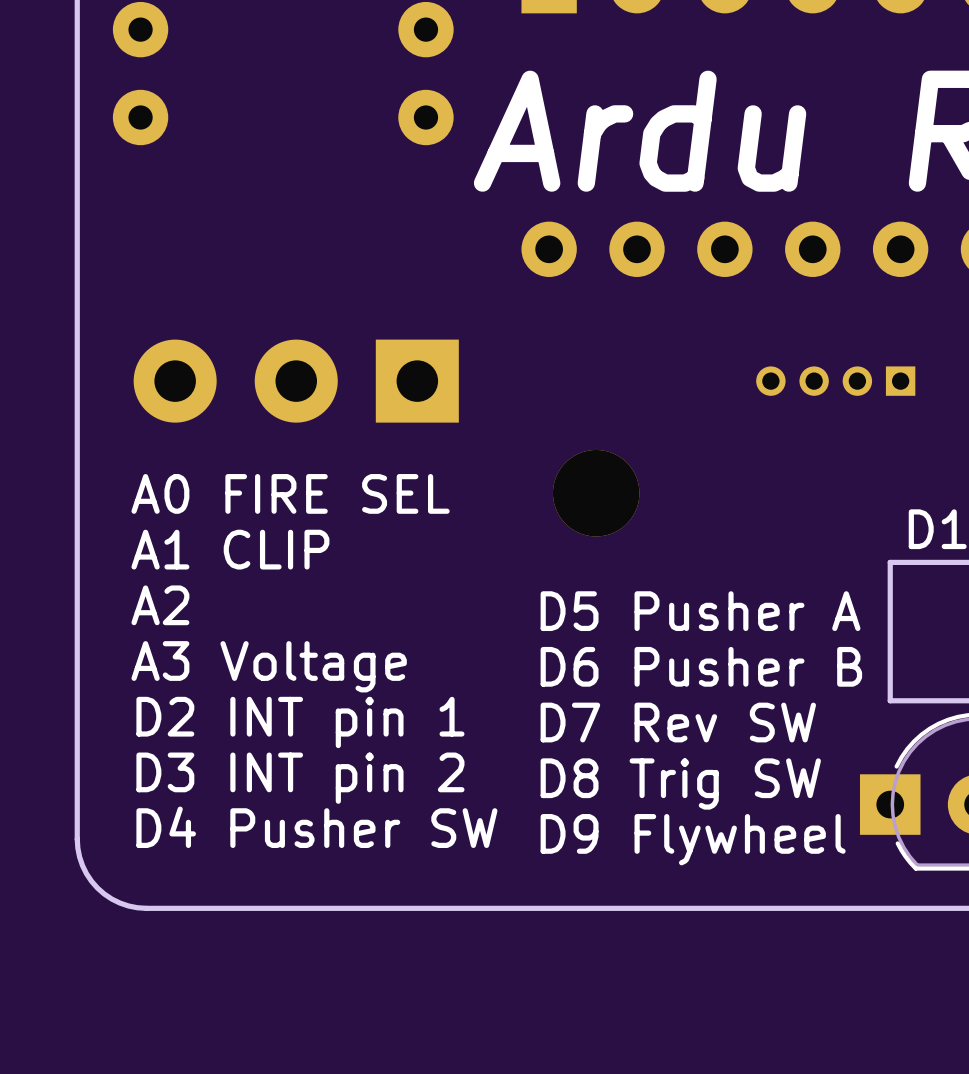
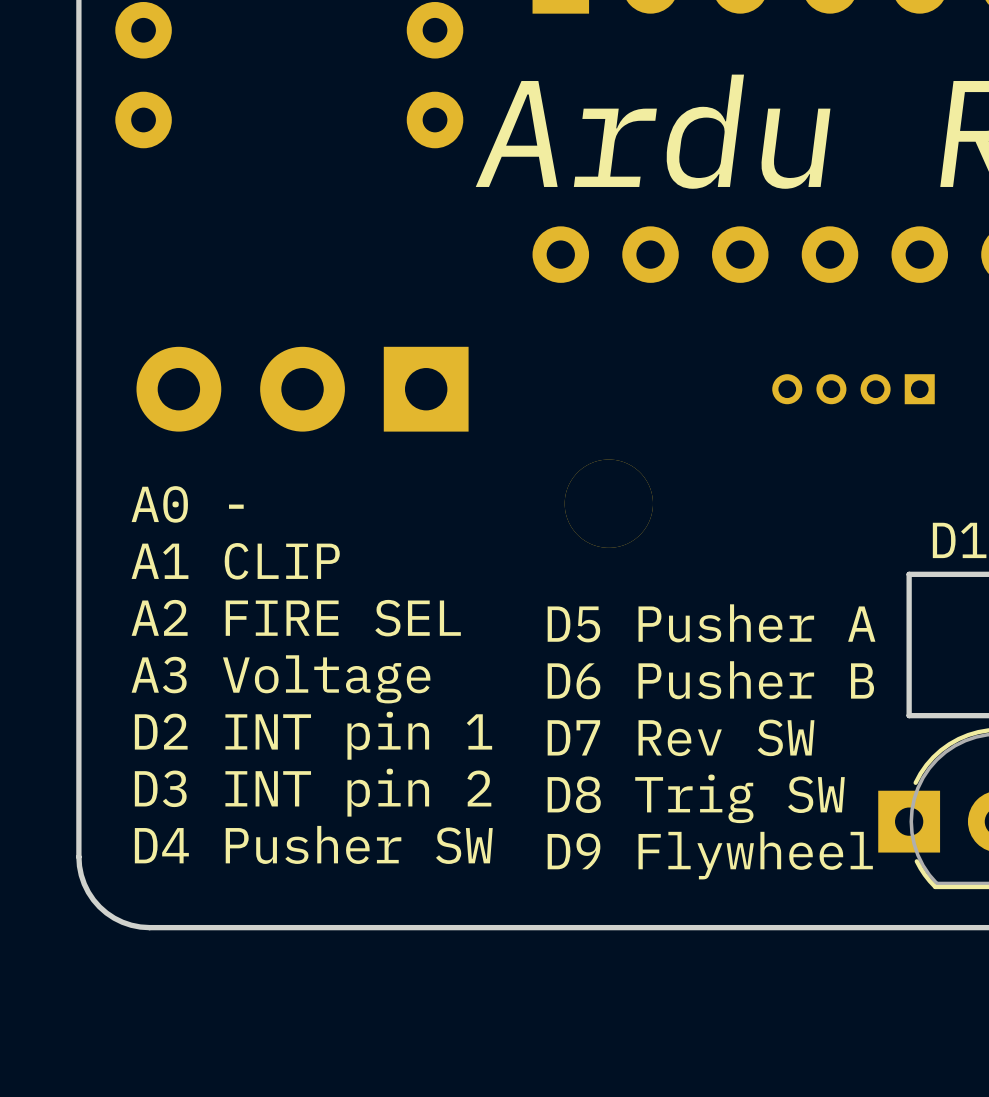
text: A0 FIRE SEL (290, 493) -> A0 - (187, 504)
text: A2 (160, 605) -> A2 FIRE SEL (296, 618)

